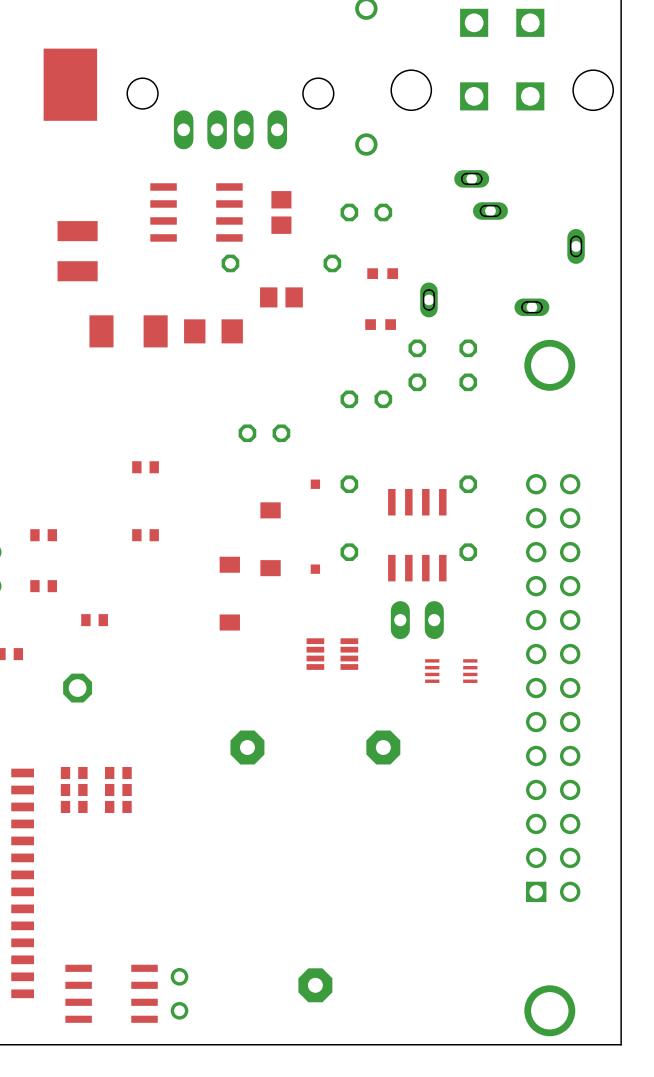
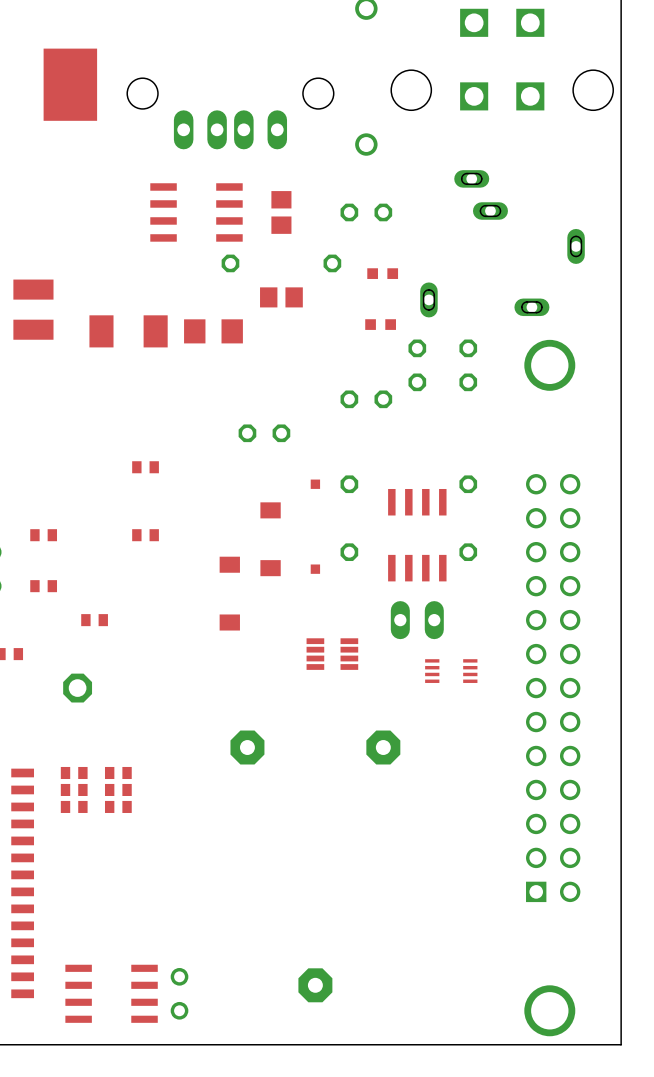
part position: (77, 251) -> (33, 309)

